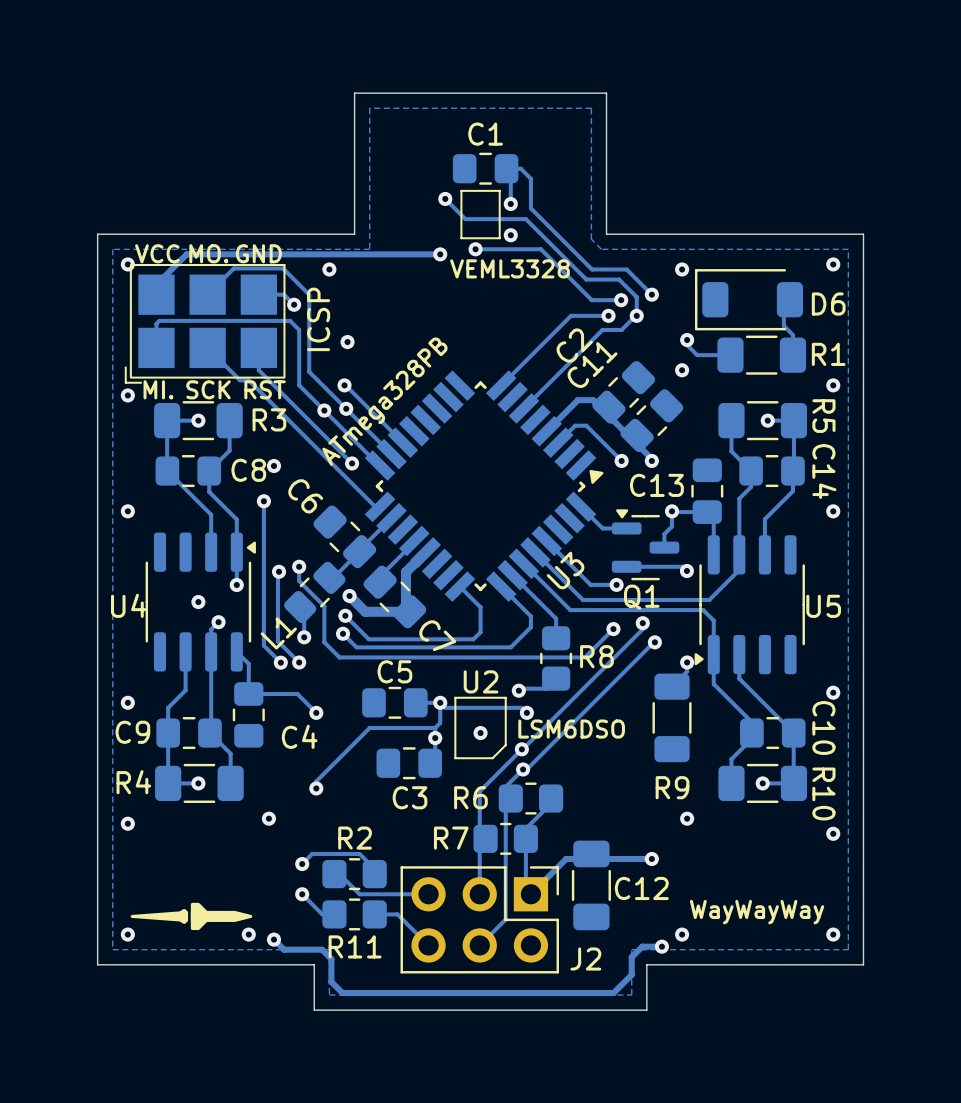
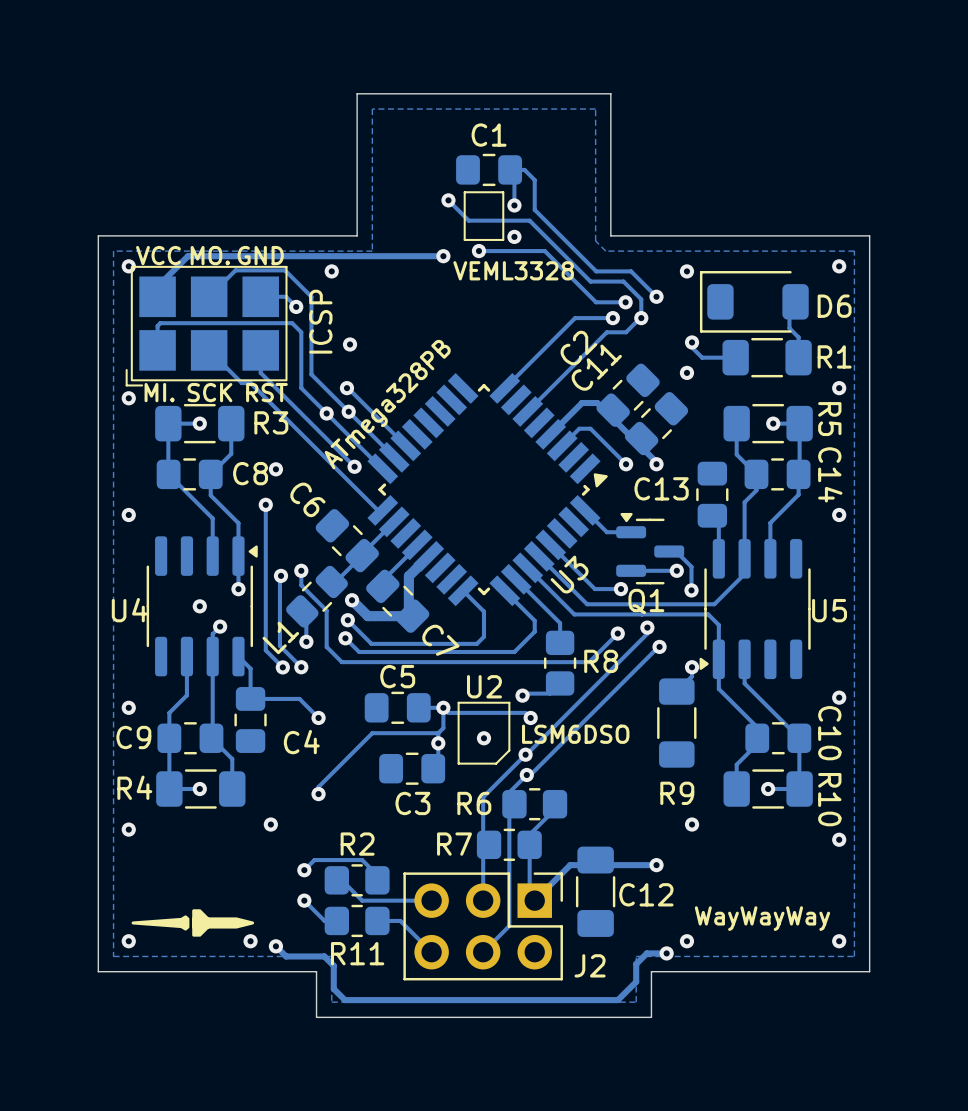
via: (672, 511) -> none
track: (707, 512) (672, 511) (672, 526) (664, 534) (664, 547) -> (691, 590) (691, 566) (676, 551) (669, 551)
track: (672, 566) (682, 566) (686, 570) -> none
via: none -> (676, 570)
via: (686, 570) -> none
via: none -> (691, 590)

